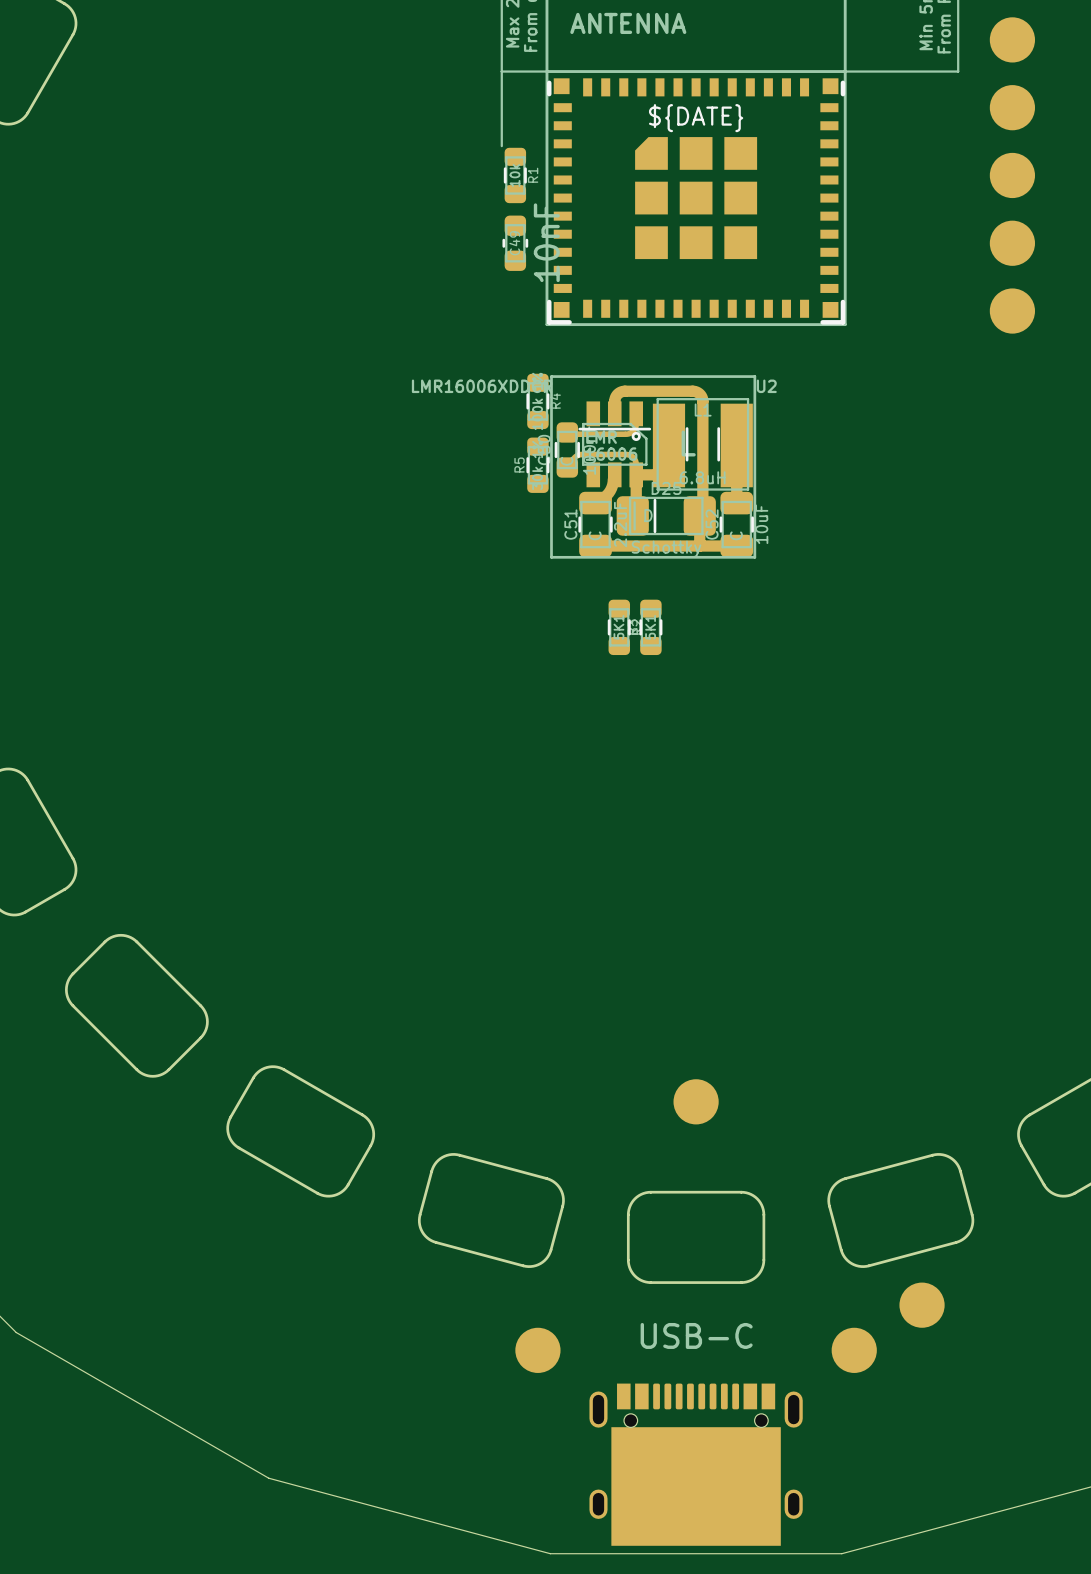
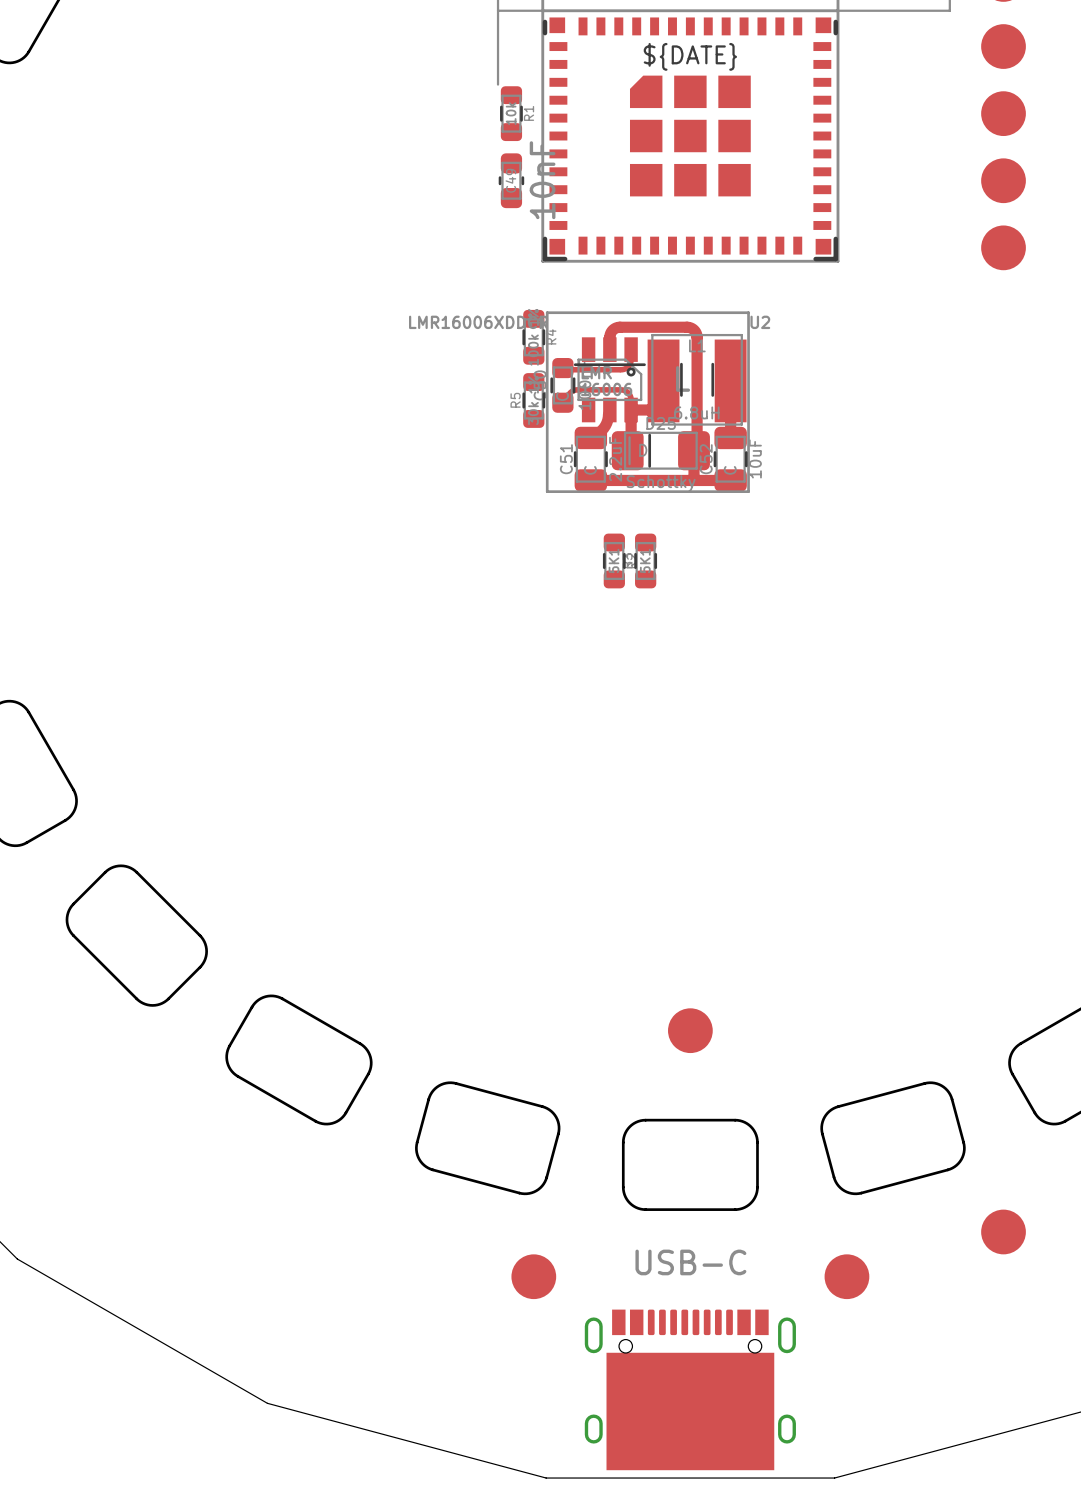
part position: (922, 1305) -> (1003, 1231)

